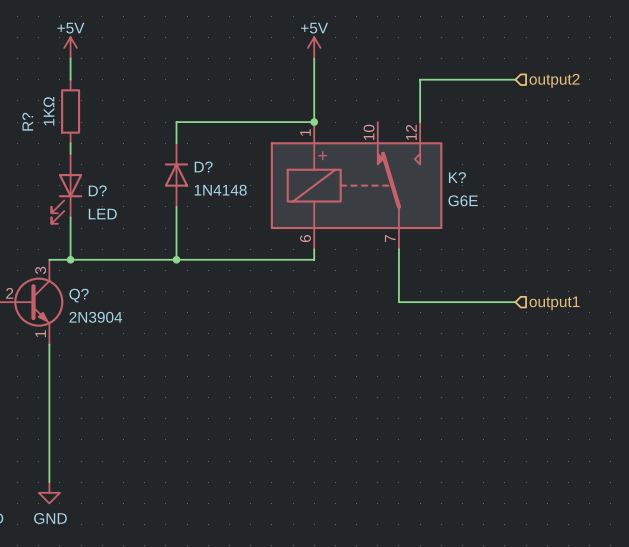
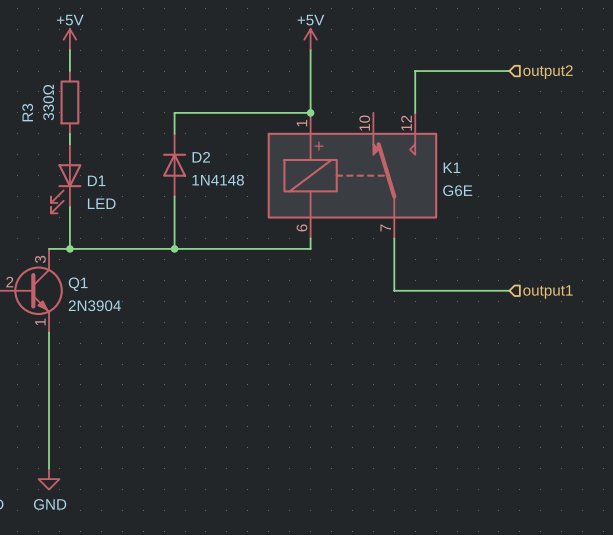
R? value: 1KΩ (48, 111) -> 330Ω (48, 102)
R? name: R? (27, 121) -> R3 (27, 112)
D? name: D? (203, 166) -> D2 (201, 157)
K? name: K? (457, 177) -> K1 (451, 167)
D? name: D? (97, 190) -> D1 (96, 180)
Q? name: Q? (79, 295) -> Q1 (78, 284)

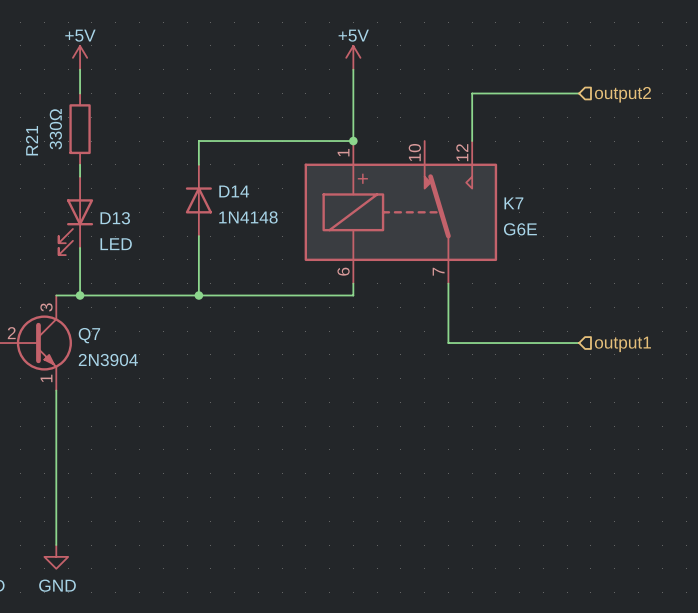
R3 name: R3 (27, 112) -> R21 (32, 140)
D2 name: D2 (201, 157) -> D14 (234, 191)
K1 name: K1 (451, 167) -> K7 (513, 203)
D1 name: D1 (96, 180) -> D13 (115, 218)
Q1 name: Q1 (78, 284) -> Q7 (89, 335)

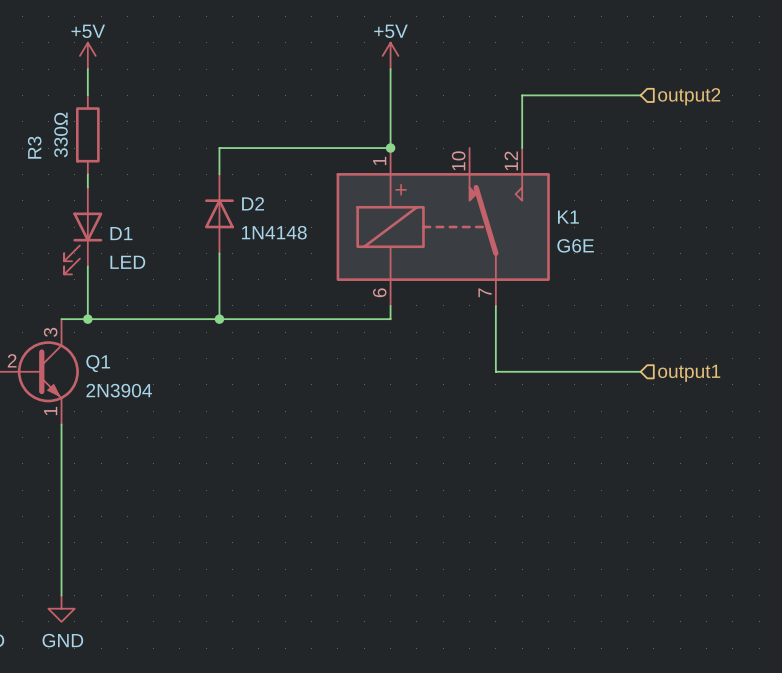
R21 name: R21 (32, 140) -> R3 (34, 147)
D14 name: D14 (234, 191) -> D2 (253, 203)
K7 name: K7 (513, 203) -> K1 (568, 217)
D13 name: D13 (115, 218) -> D1 (121, 233)
Q7 name: Q7 (89, 335) -> Q1 (98, 363)

